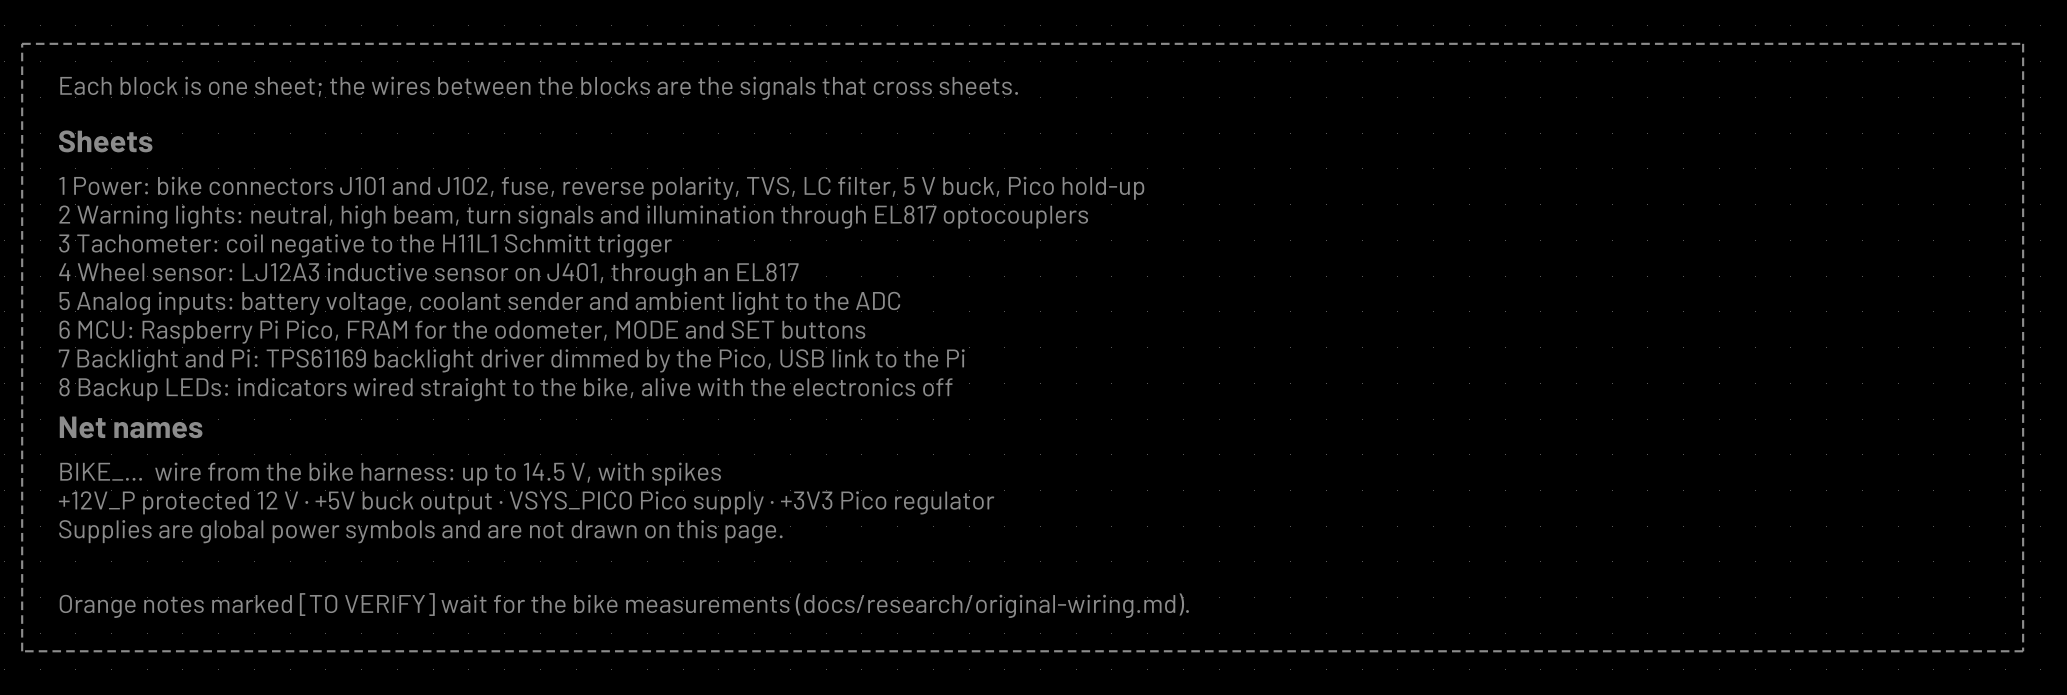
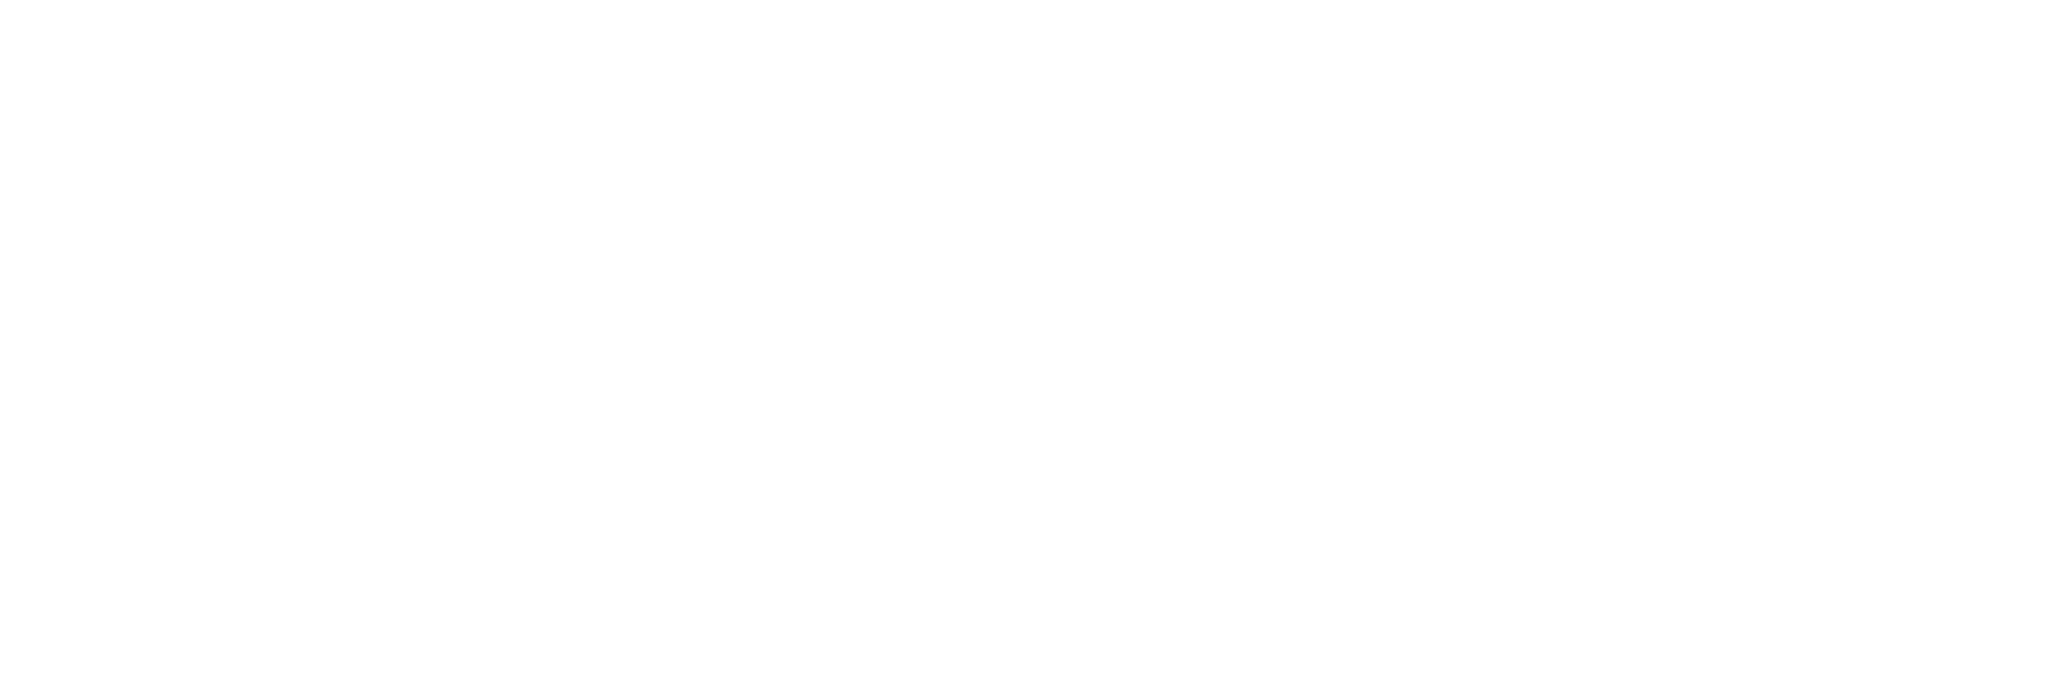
line: (22, 43) (2023, 43) (2023, 651) (22, 651) (22, 43) -> none
text: Each block is one sheet; the wires between the blocks are the signals that cross sheets. (539, 88) -> none
text: Sheets (105, 141) -> none
text: 1 Power: bike connectors J101 and J102, fuse, reverse polarity, TVS, LC filter, 5 V buck, Pico hold-up (601, 188) -> none
text: 2 Warning lights: neutral, high beam, turn signals and illumination through EL817 optocouplers (573, 217) -> none
text: 3 Tachometer: coil negative to the H11L1 Schmitt trigger (365, 245) -> none
text: 4 Wheel sensor: LJ12A3 inductive sensor on J401, through an EL817 (428, 274) -> none
text: 5 Analog inputs: battery voltage, coolant sender and ambient light to the ADC (479, 303) -> none
text: 6 MCU: Raspberry Pi Pico, FRAM for the odometer, MODE and SET buttons (462, 332) -> none
text: 7 Backlight and Pi: TPS61169 backlight driver dimmed by the Pico, USB link to the Pi (511, 360) -> none
text: 8 Backup LEDs: indicators wired straight to the bike, alive with the electronics off (505, 389) -> none
text: Net names (131, 427) -> none
text: BIKE_… wire from the bike harness: up to 14.5 V, with spikes (390, 474) -> none
text: +12V_P protected 12 V · +5V buck output · VSYS_PICO Pico supply · +3V3 Pico regulator (526, 502) -> none
text: Supplies are global power symbols and are not drawn on this page. (420, 531) -> none
text: Orange notes marked [TO VERIFY] wait for the bike measurements (docs/research/original-wiring.md). (624, 605) -> none

